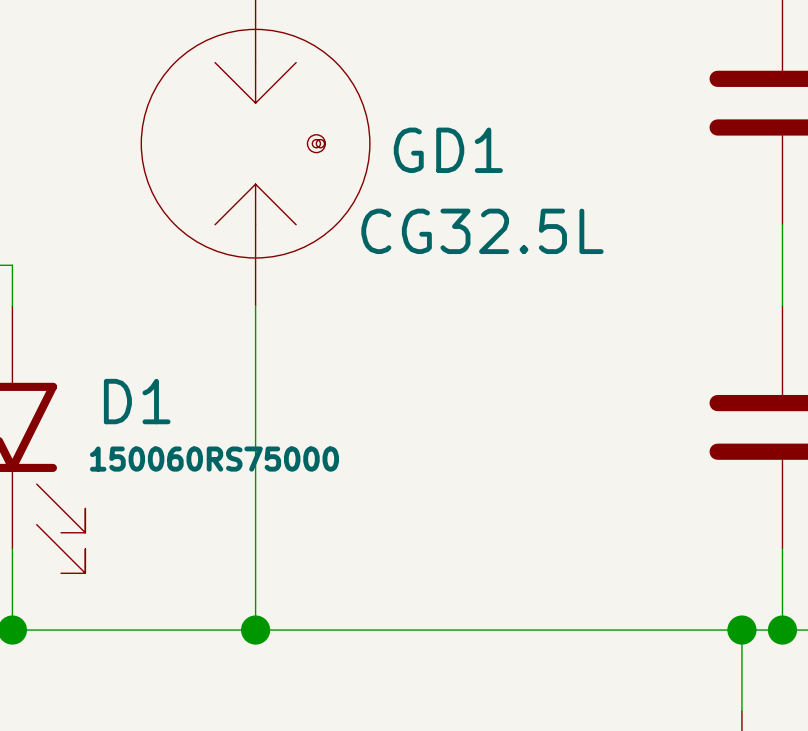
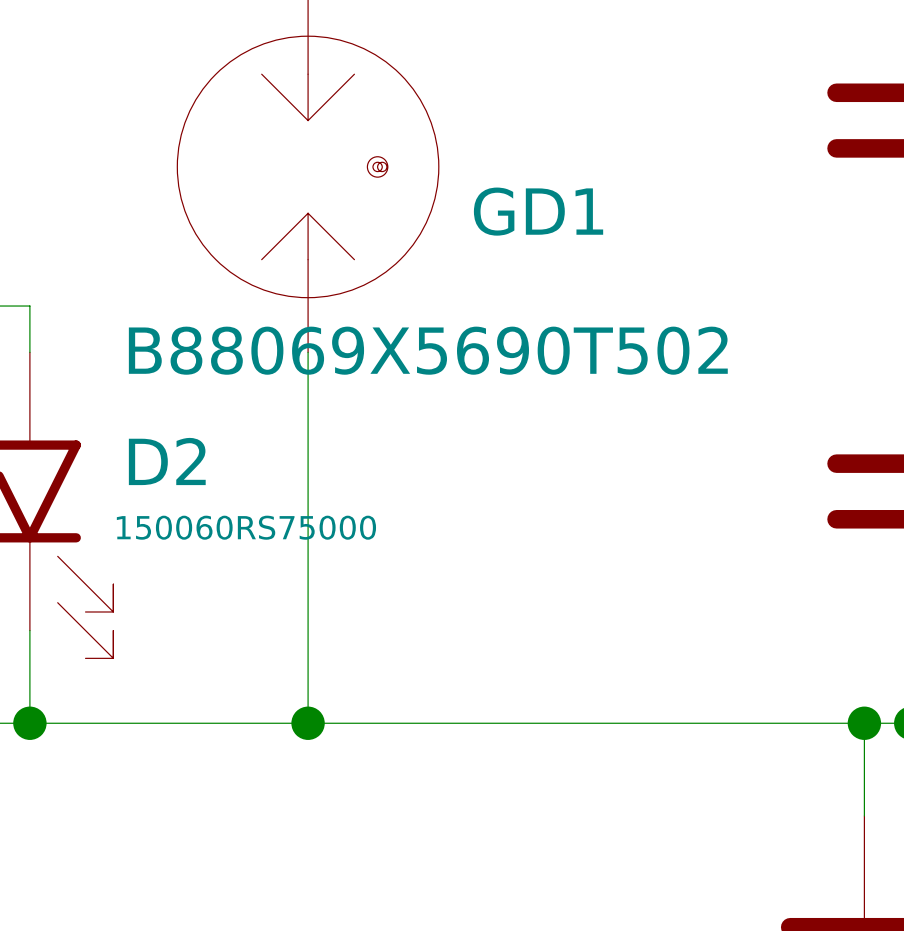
GD1 name position: GD1 (448, 150) -> GD1 (538, 211)
GD1 value: CG32.5L (482, 231) -> B88069X5690T502 (428, 350)
D1 name: D1 (137, 401) -> D2 (167, 461)

